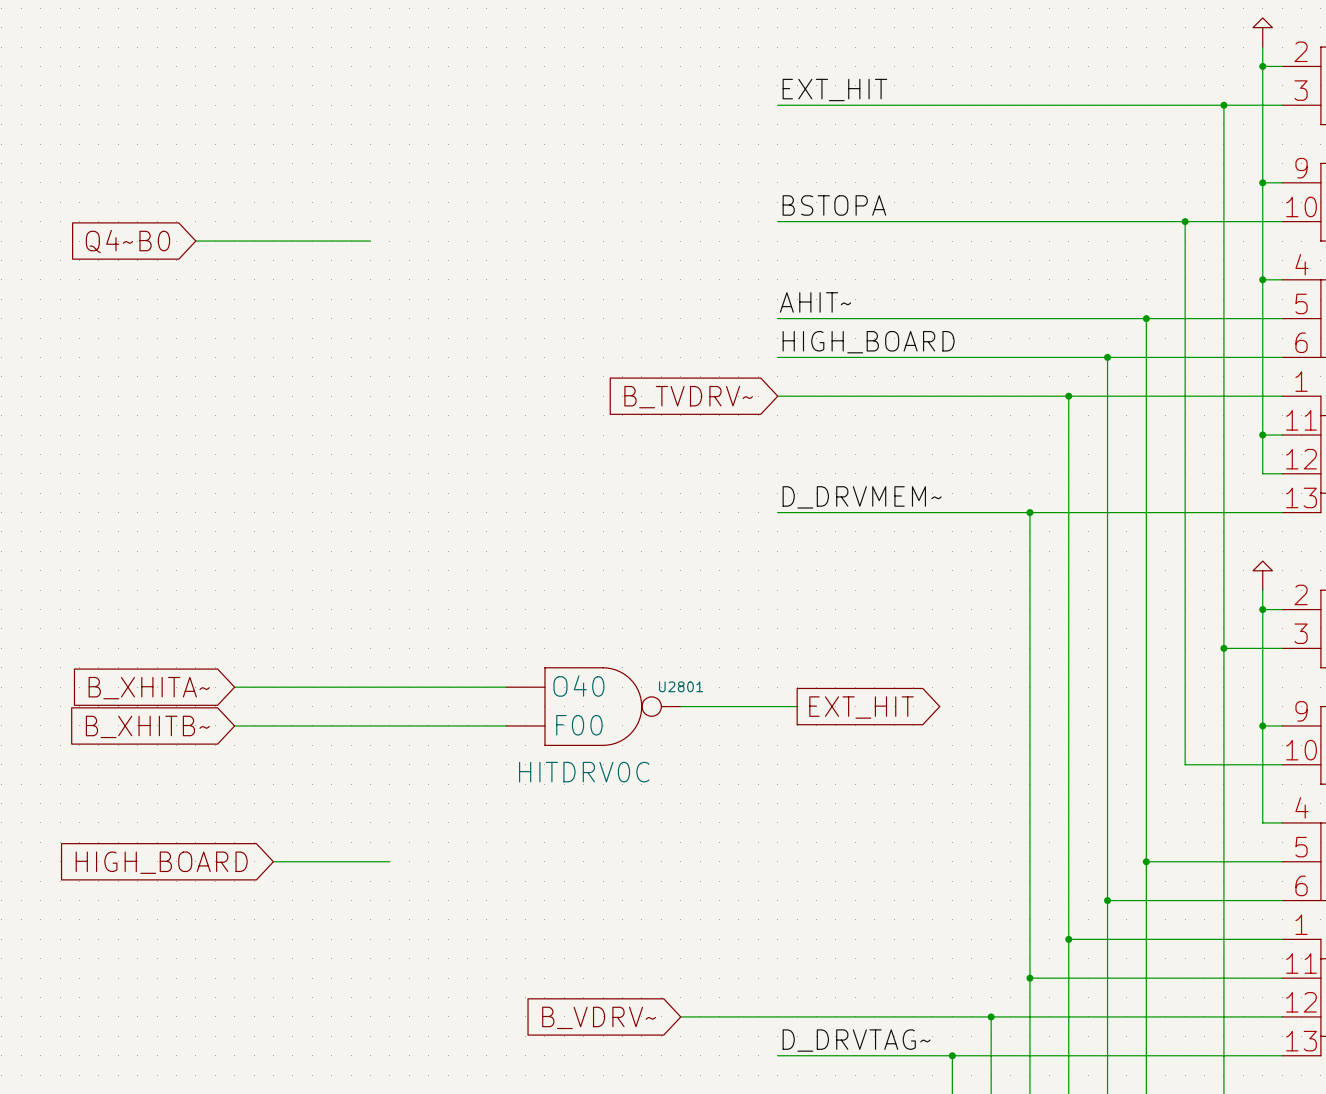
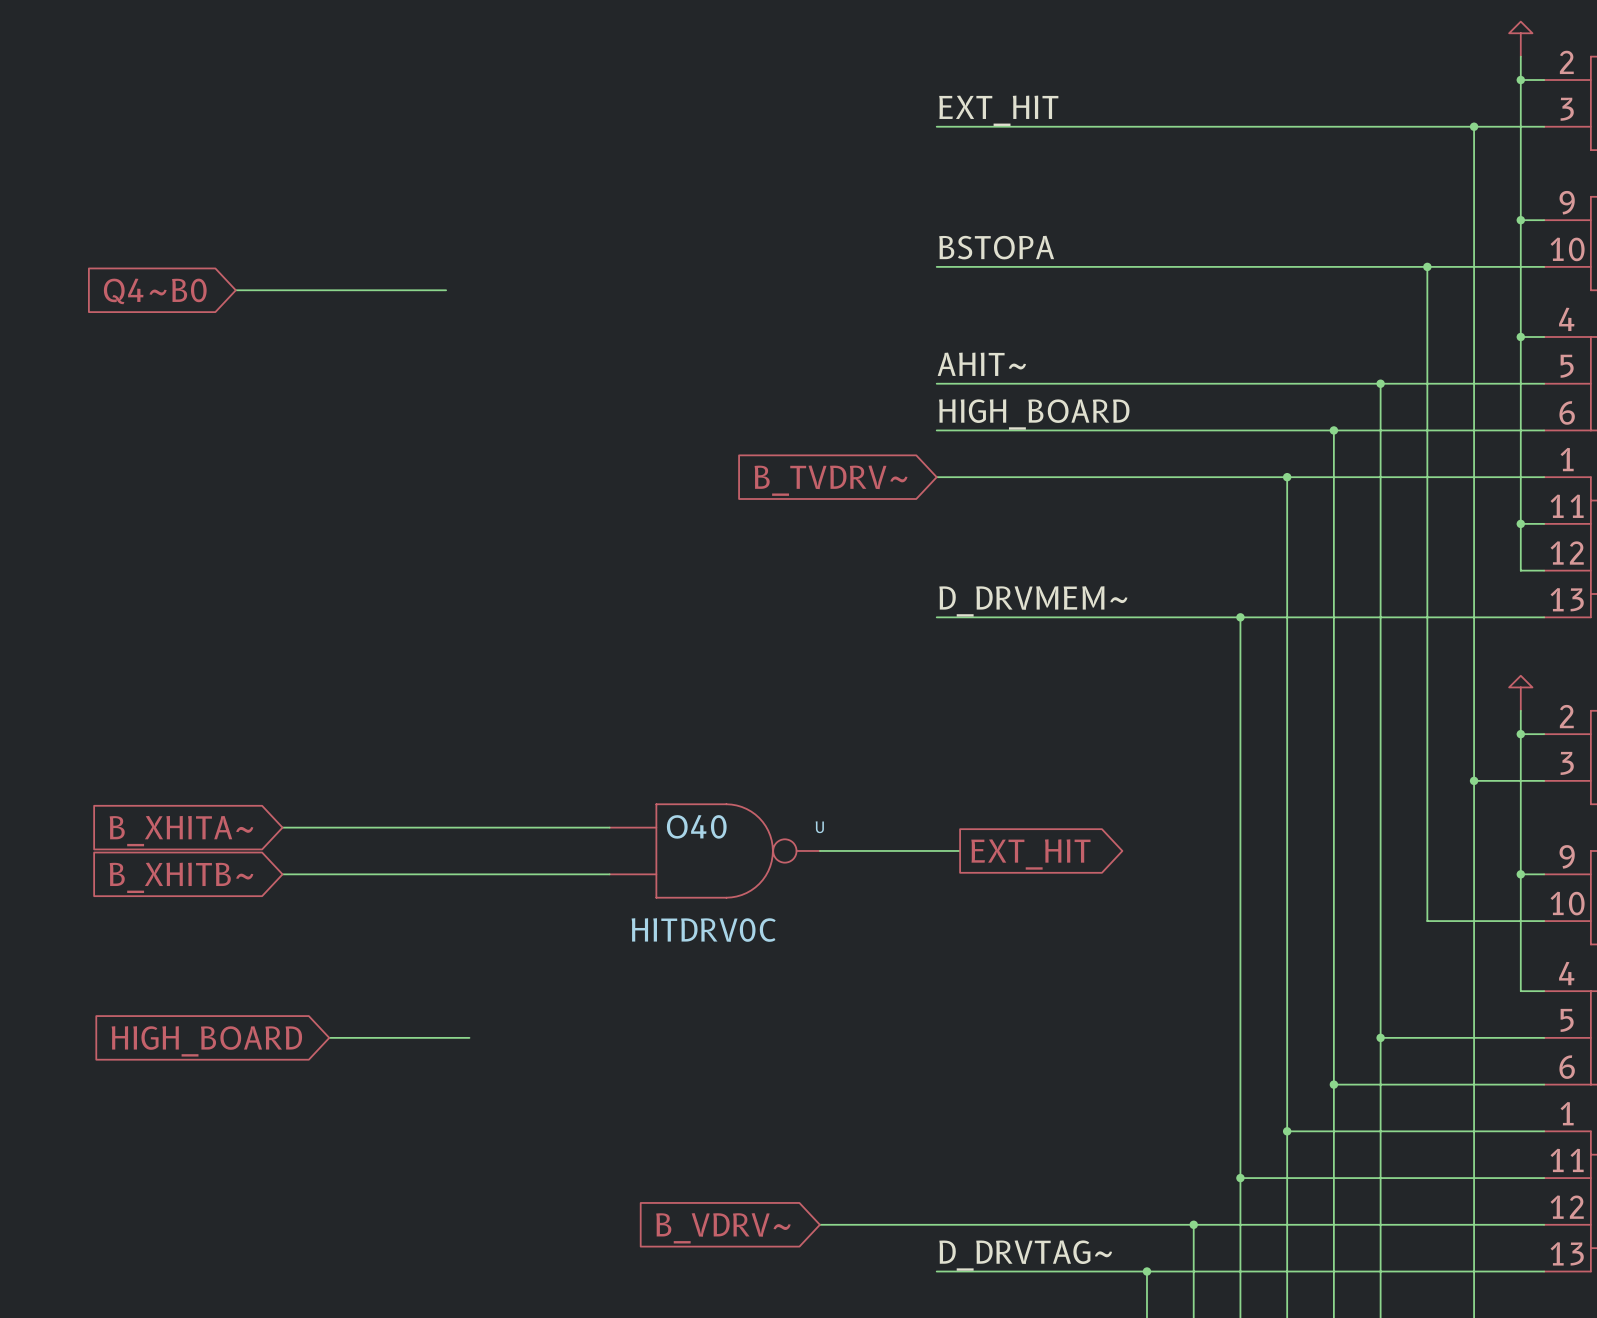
U2801 name: U2801 (681, 686) -> U (819, 827)
U2801 value: F00 (579, 725) -> none

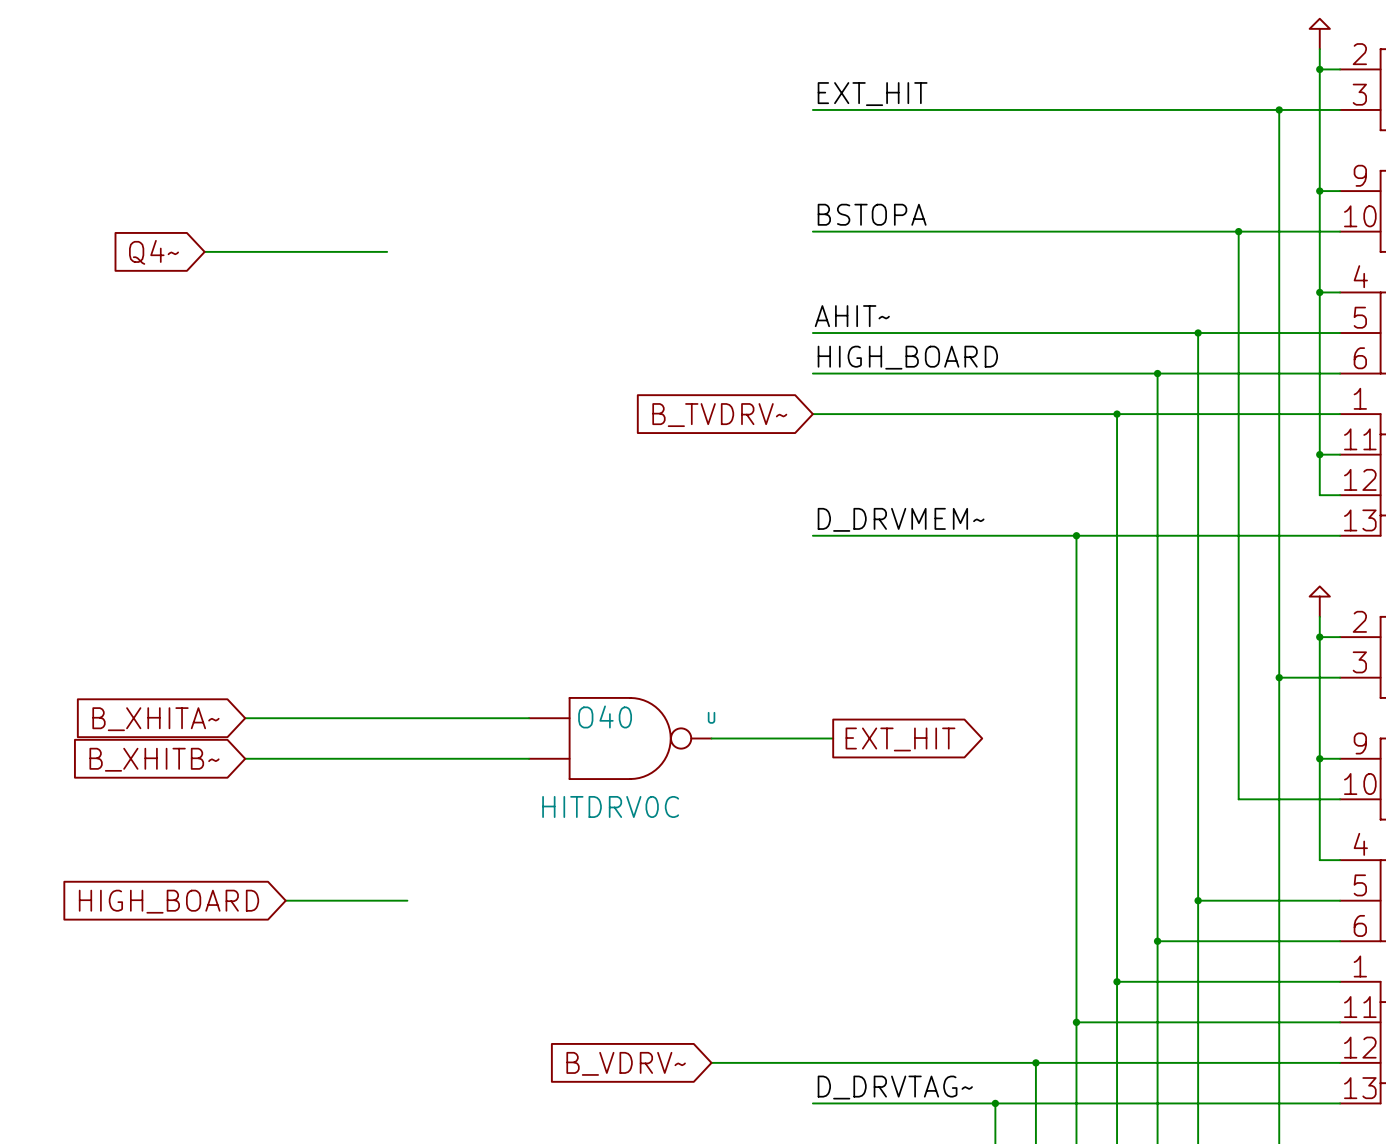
global label: Q4~B0 (155, 291) -> Q4~ (154, 252)

